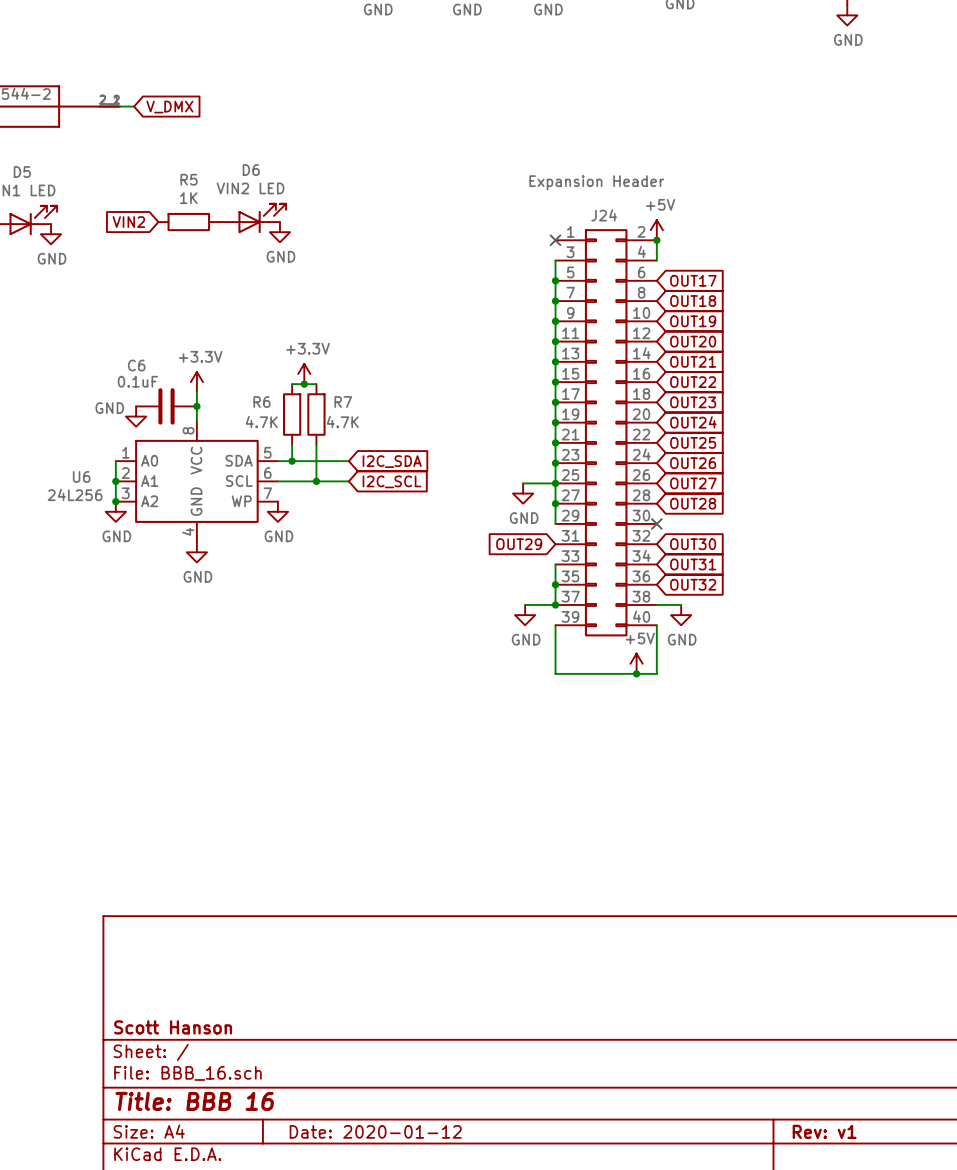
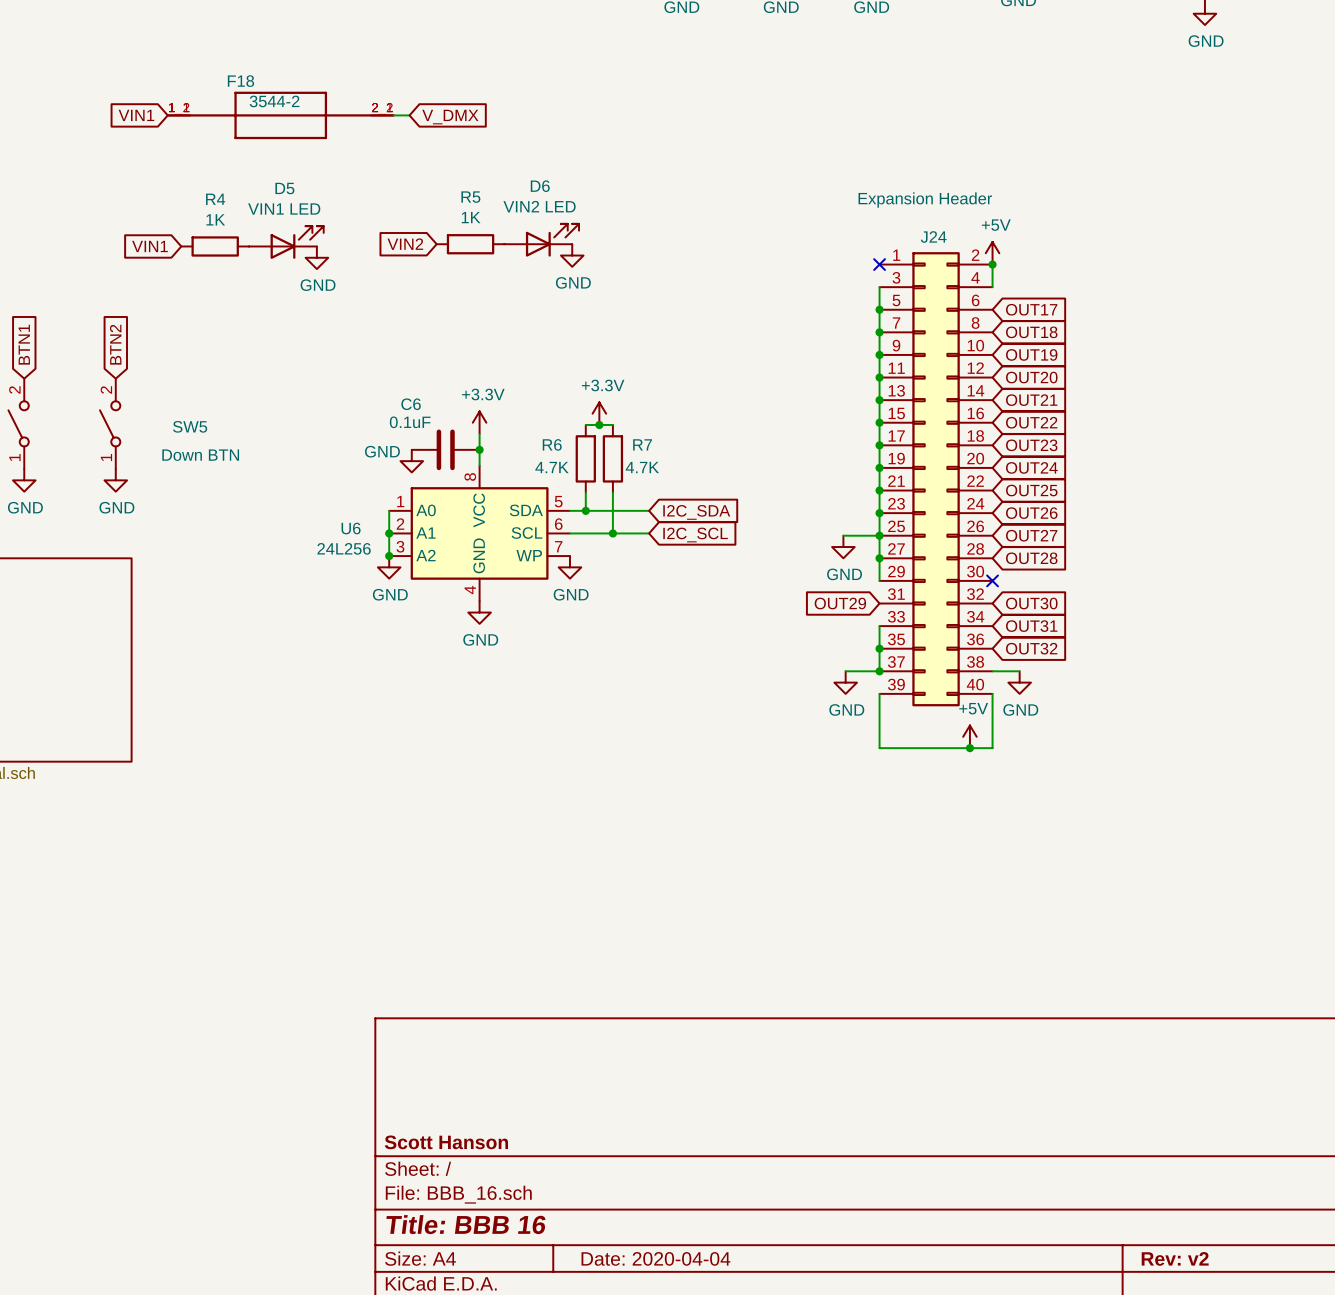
title block: Date: 2020-01-12 (375, 1131) -> Date: 2020-04-04 (655, 1258)
title block: Rev: v1 (824, 1131) -> Rev: v2 (1175, 1258)

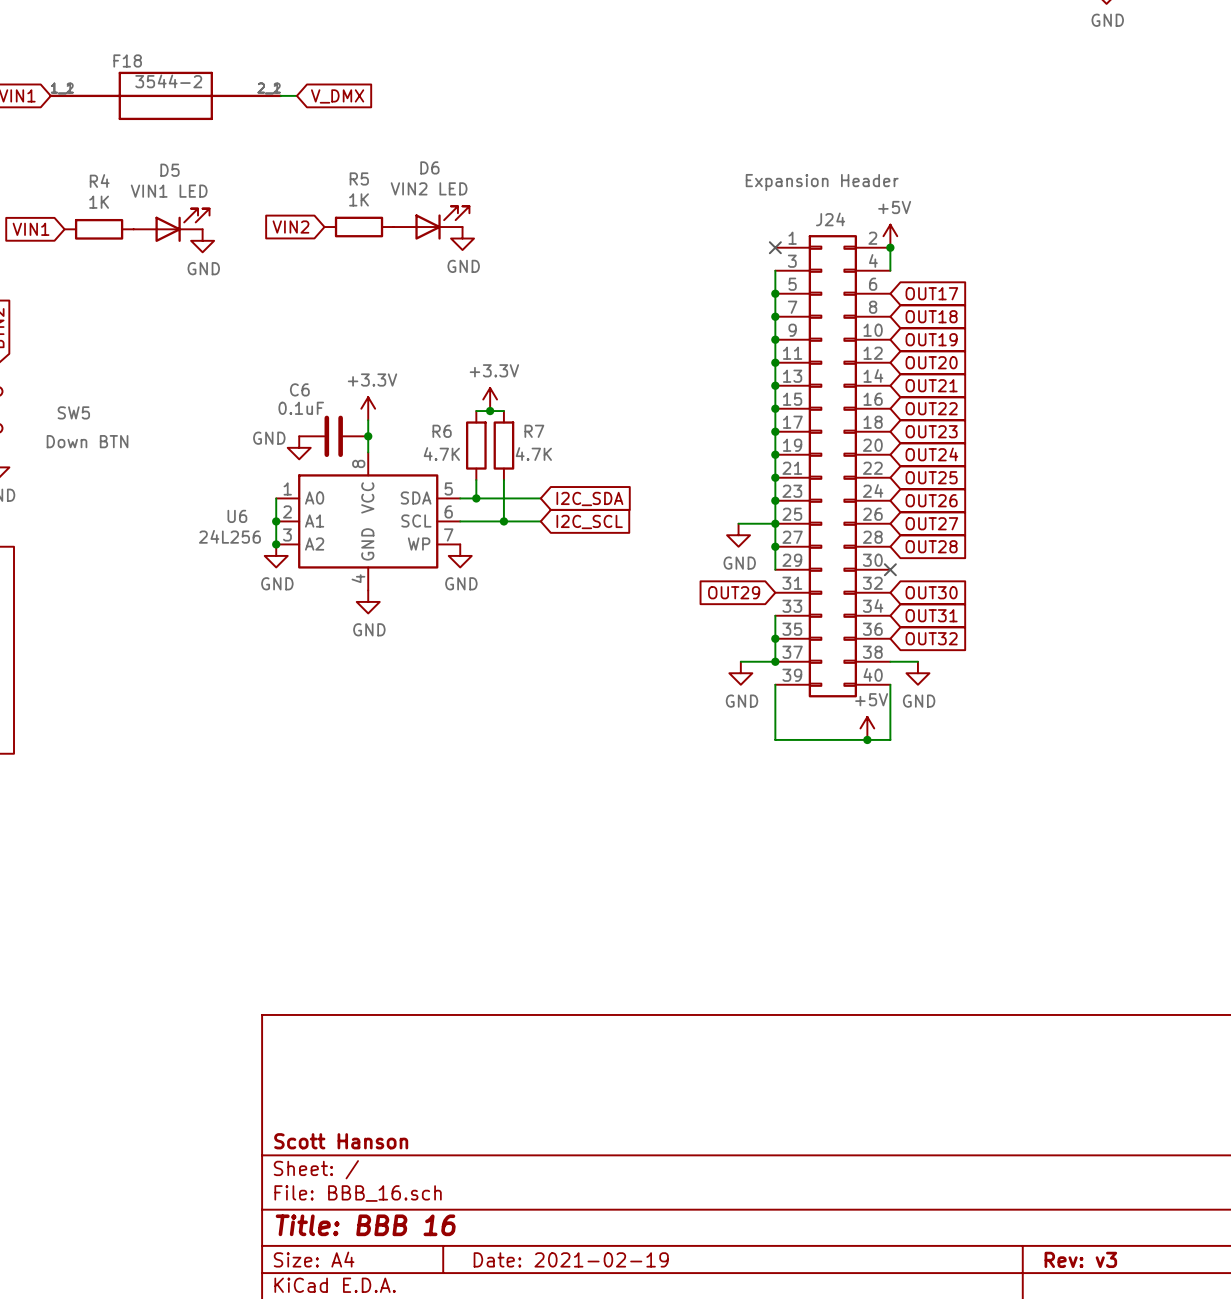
title block: Date: 2020-04-04 (655, 1258) -> Date: 2021-02-19 (571, 1259)
title block: Rev: v2 (1175, 1258) -> Rev: v3 (1080, 1259)

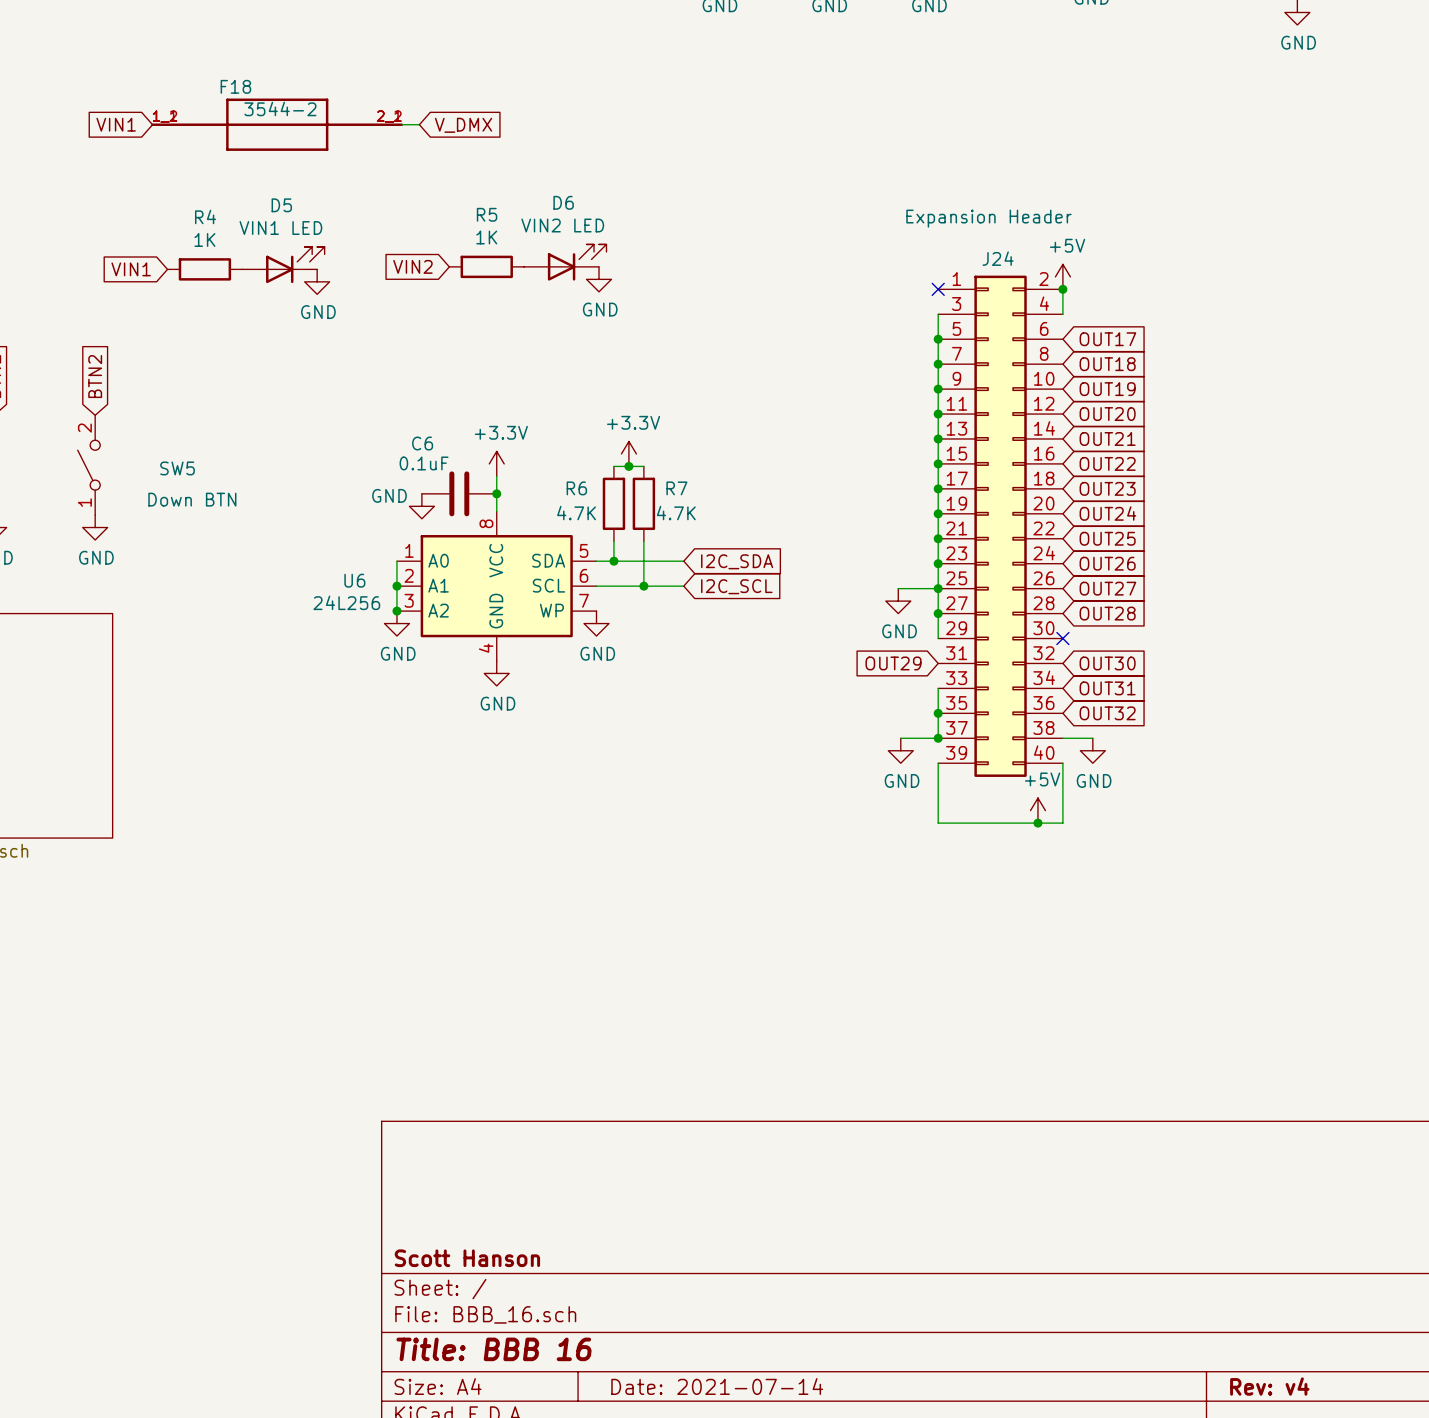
title block: Date: 2021-02-19 (571, 1259) -> Date: 2021-07-14 (717, 1386)
title block: Rev: v3 (1080, 1259) -> Rev: v4 (1269, 1386)

